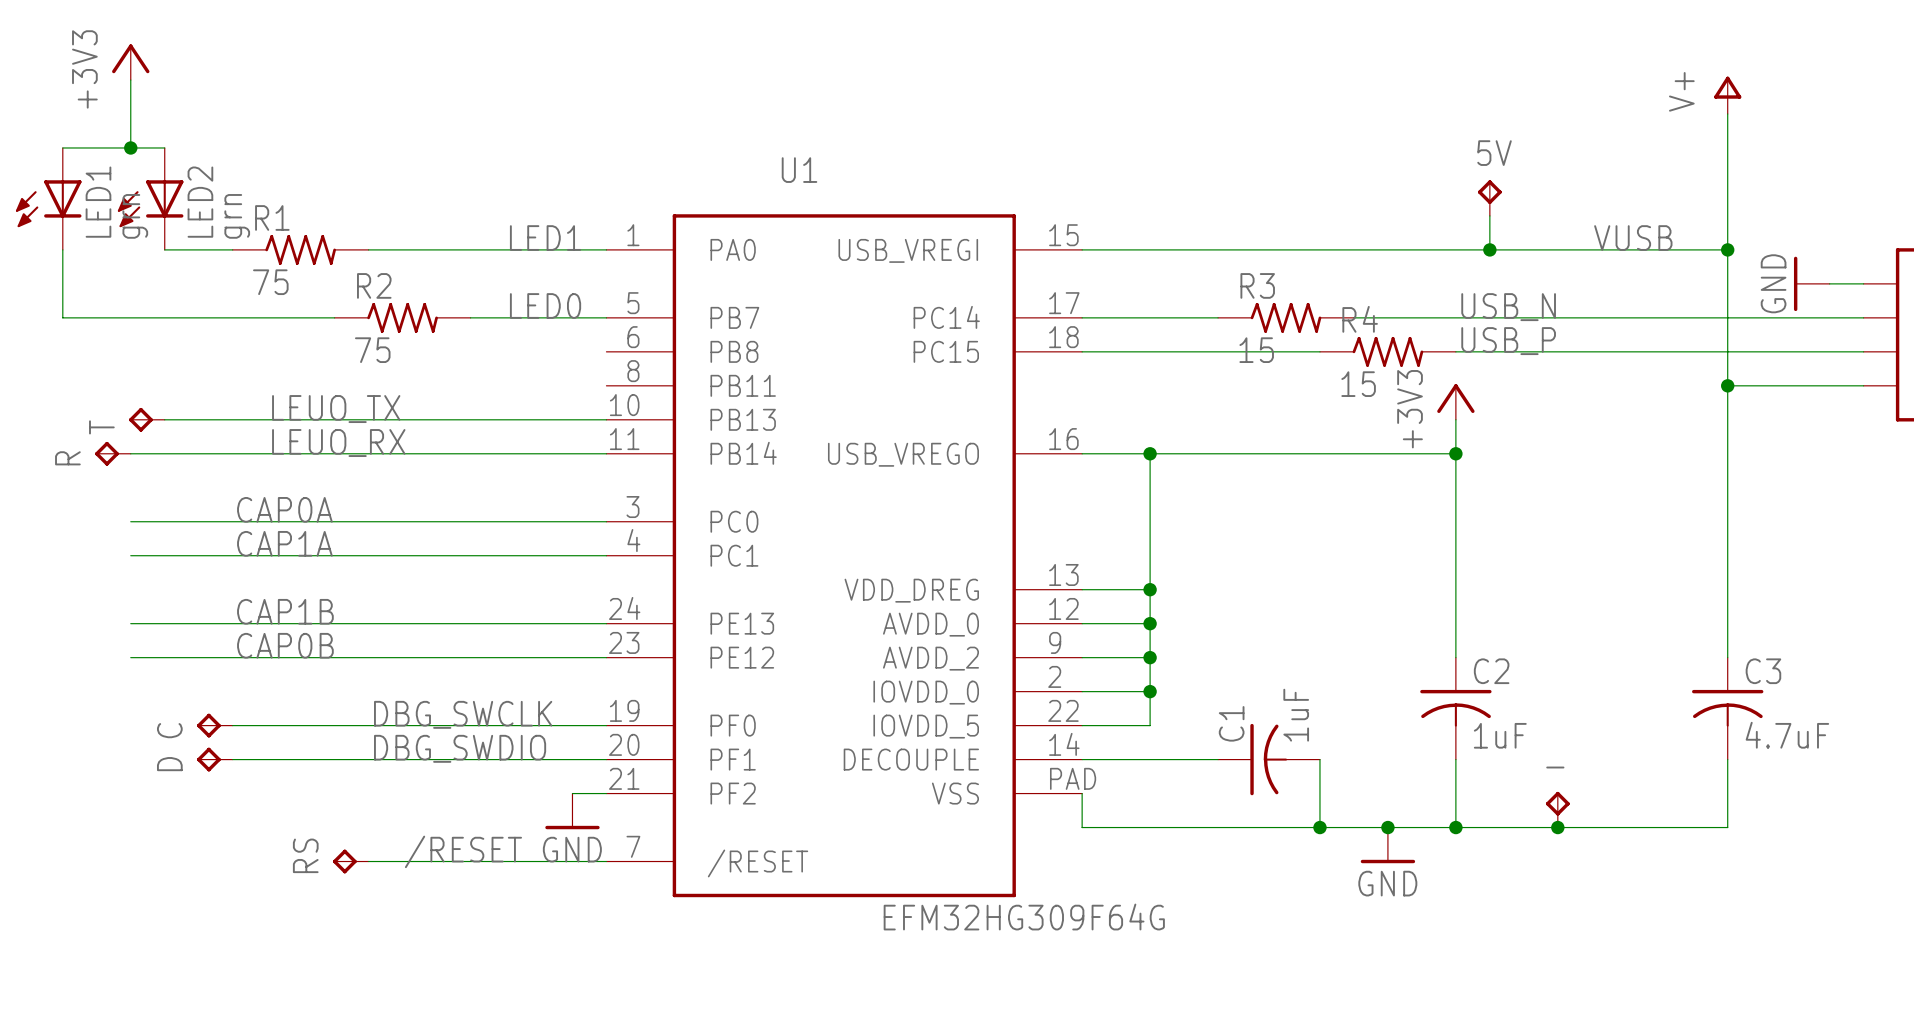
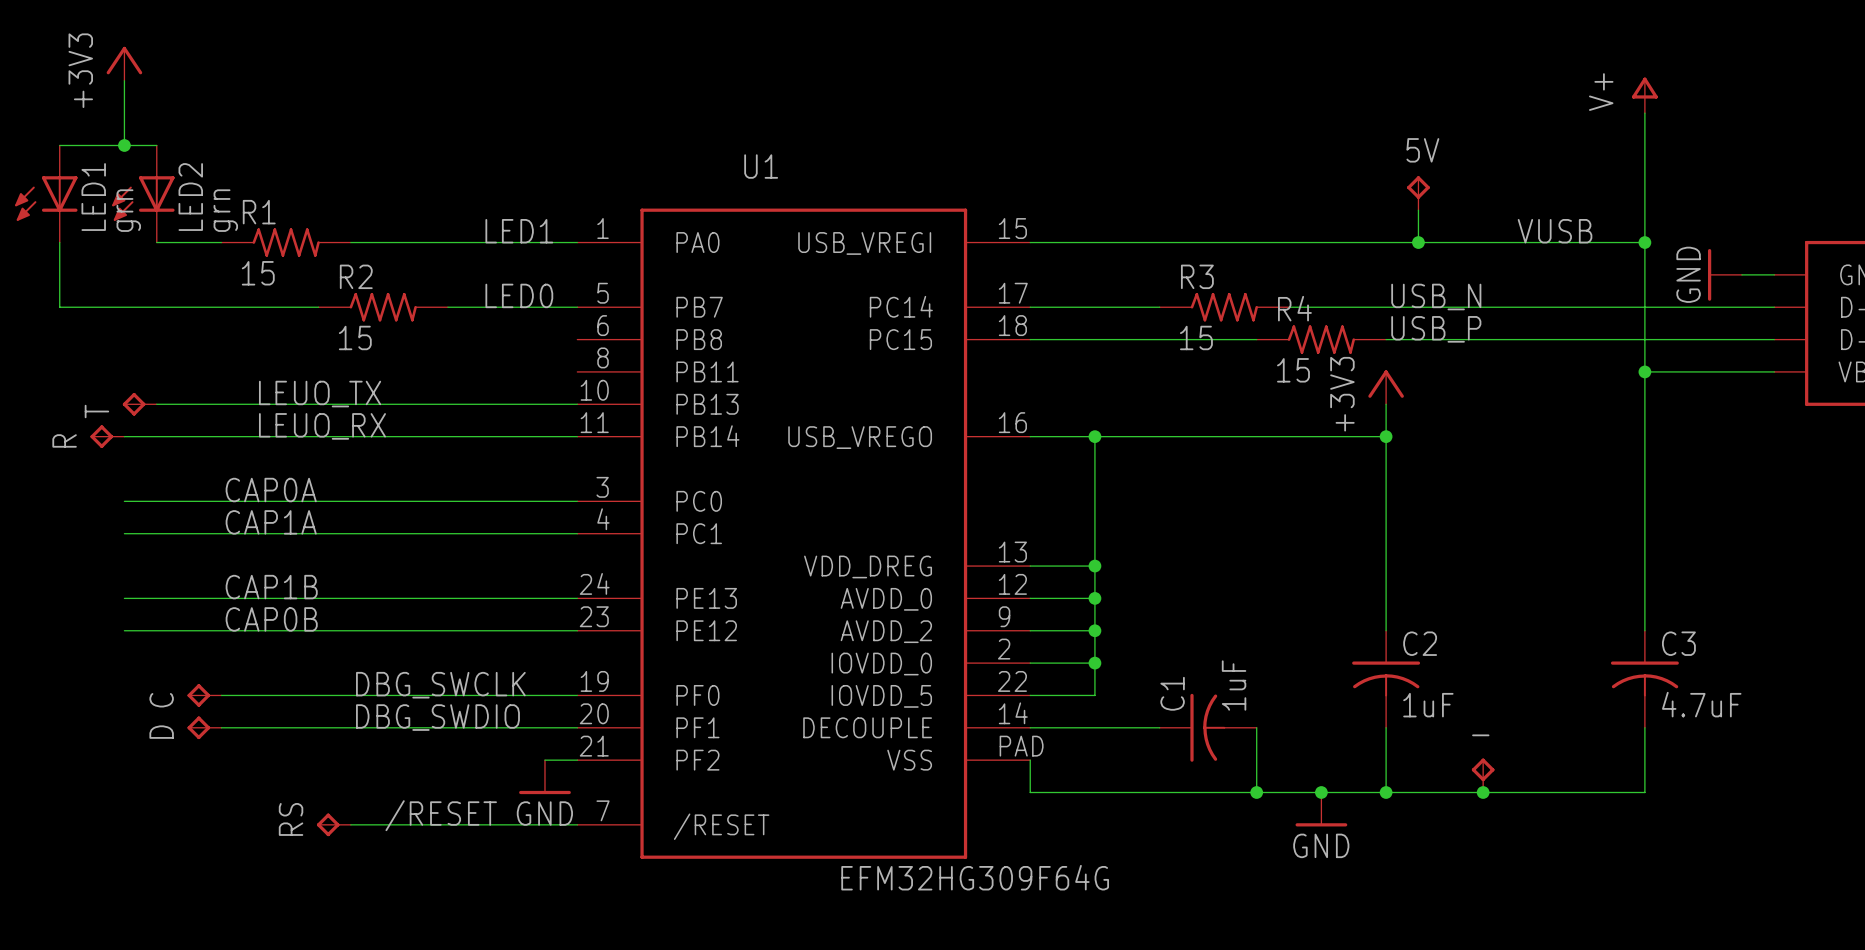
R1 value: 75 (270, 282) -> 15 (258, 273)
R2 value: 75 (372, 350) -> 15 (355, 337)

